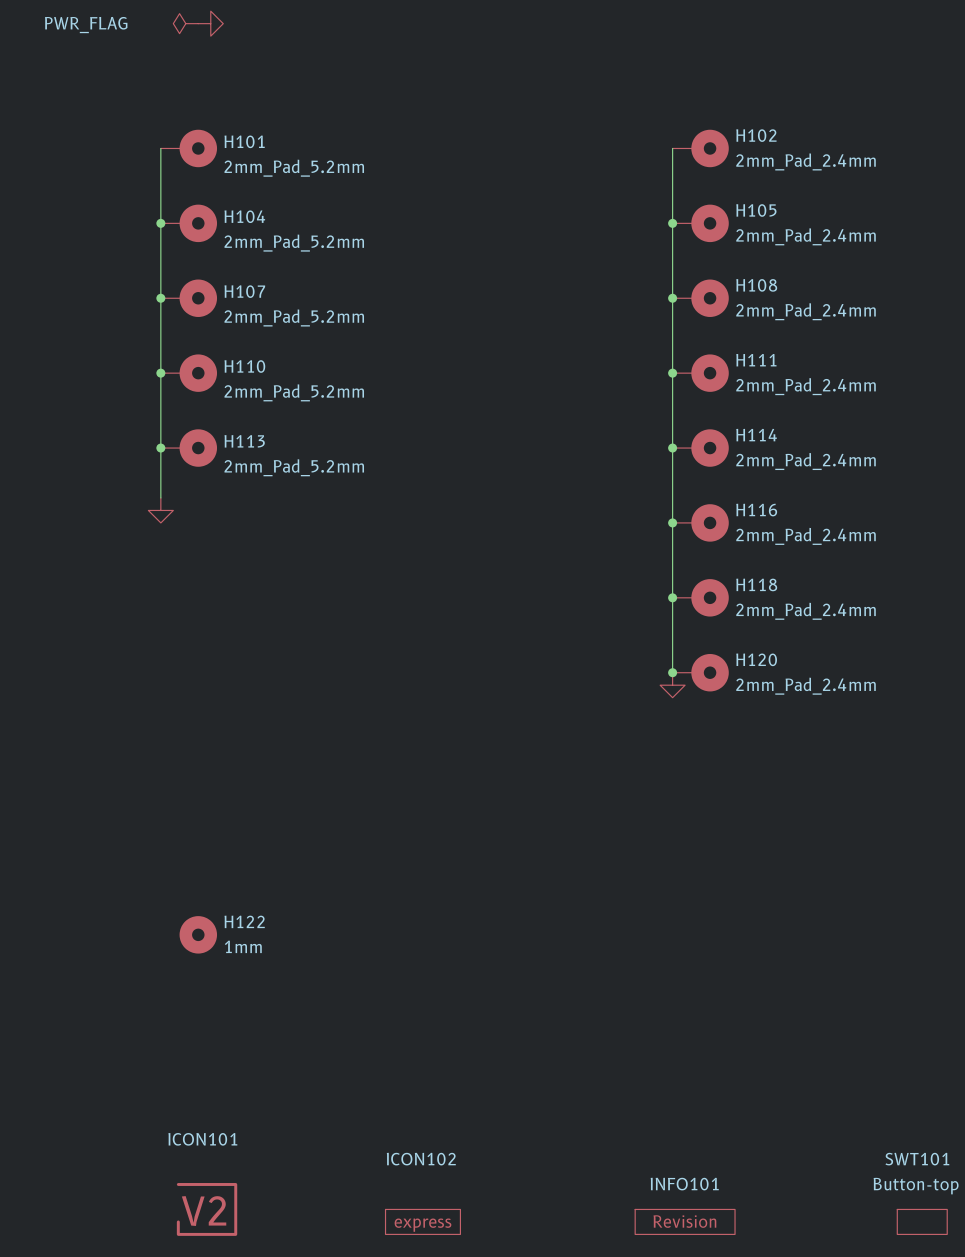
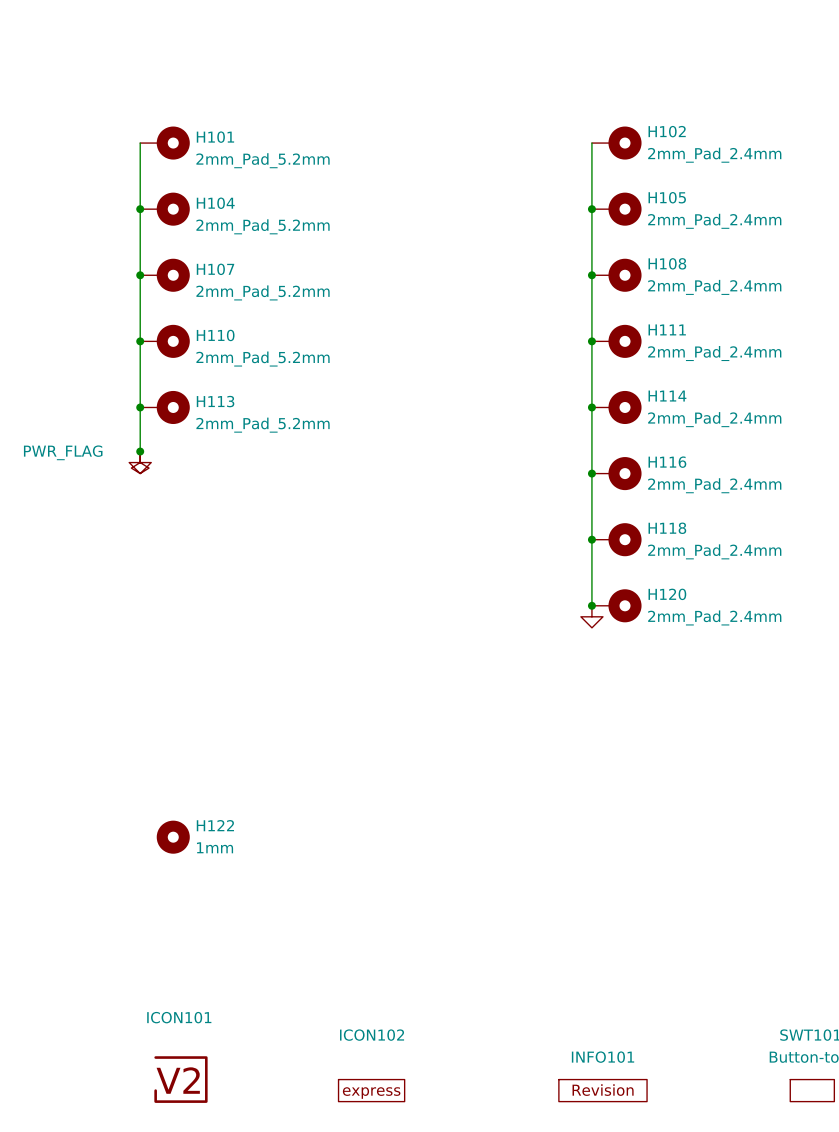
power symbol: PWR_FLAG (185, 23) -> none
power symbol: (210, 23) -> none
junction: none -> (140, 451)
power symbol: none -> PWR_FLAG (140, 462)

